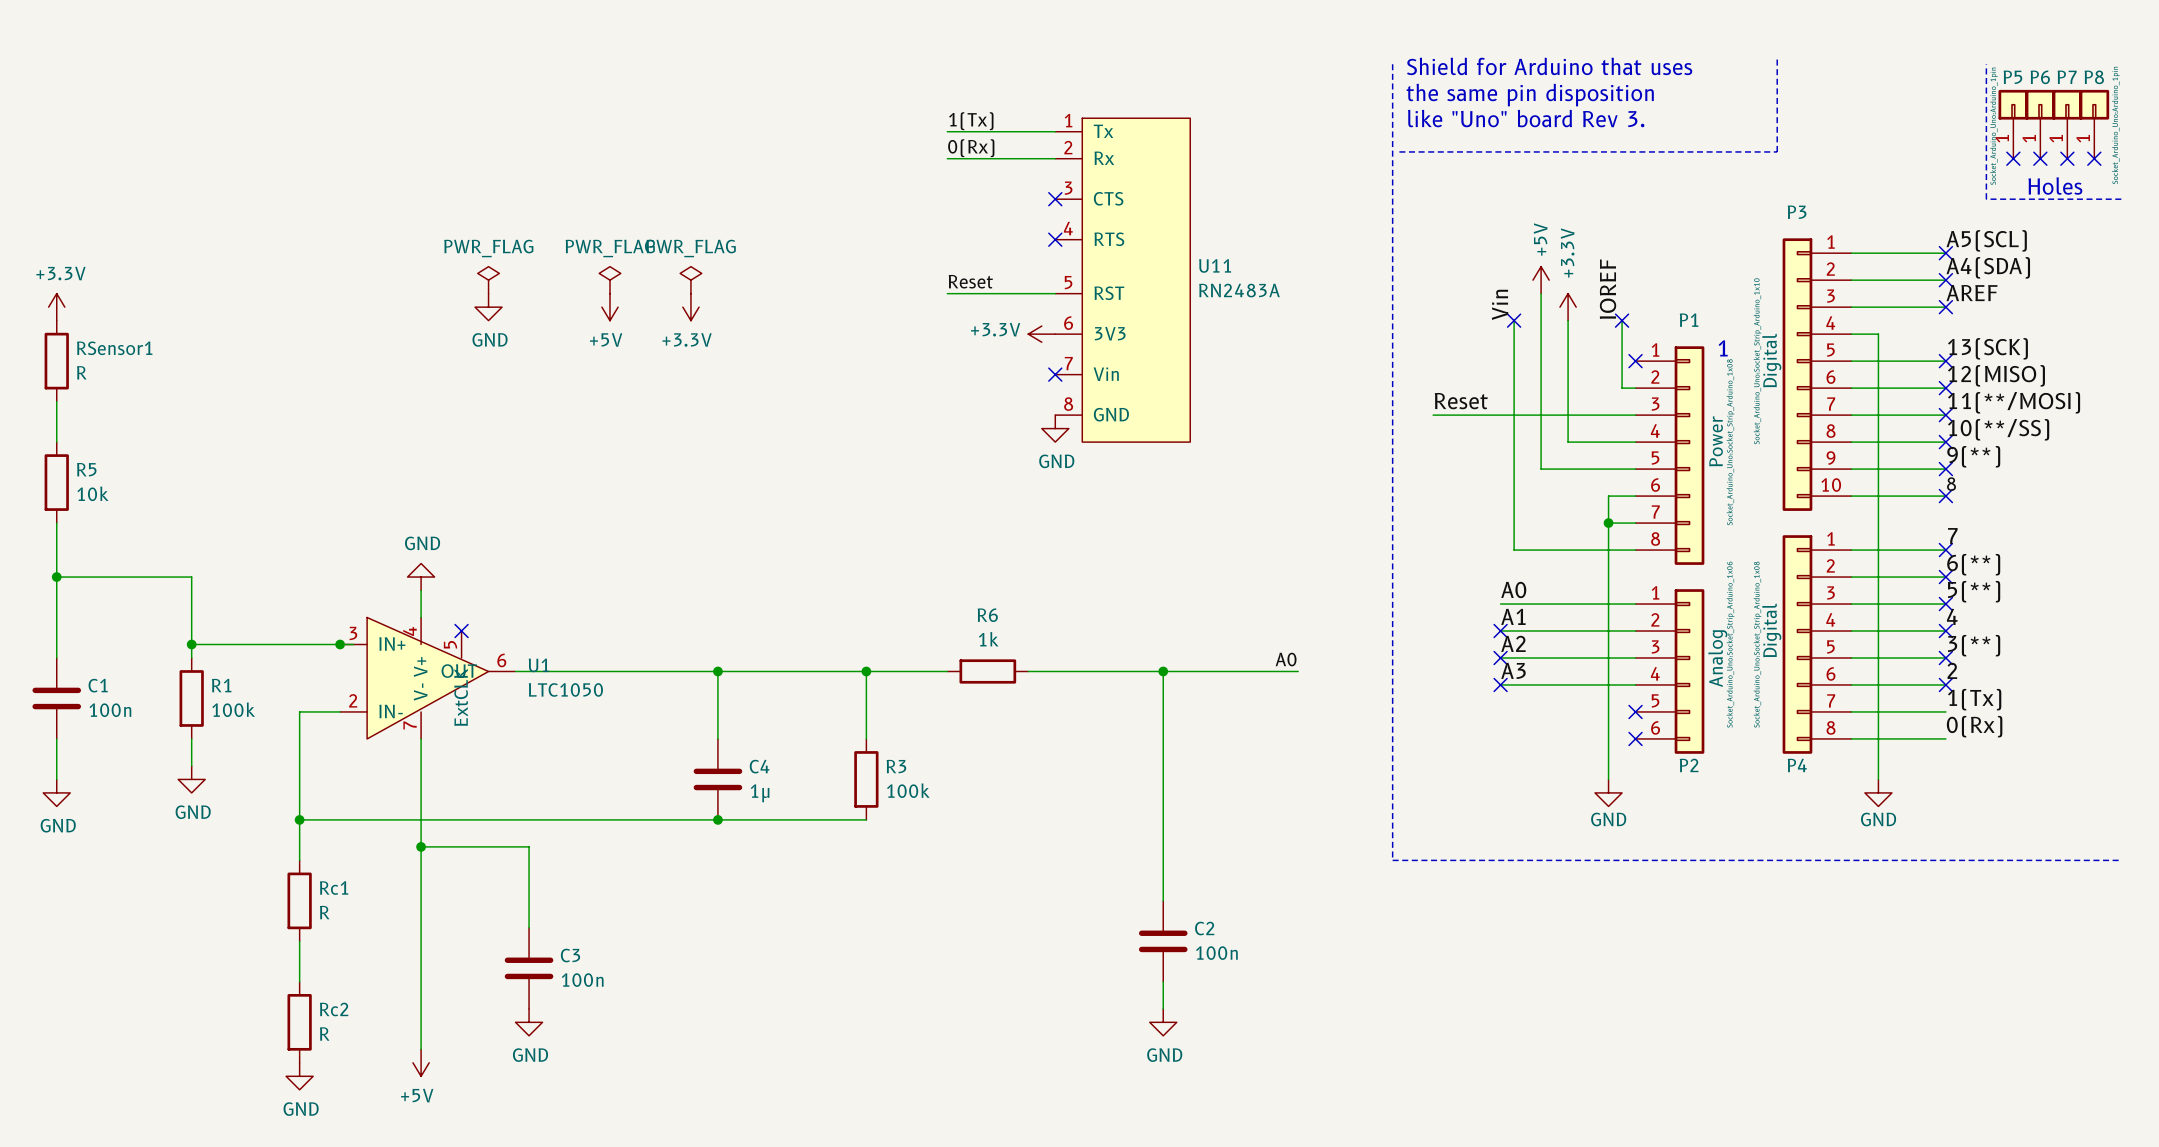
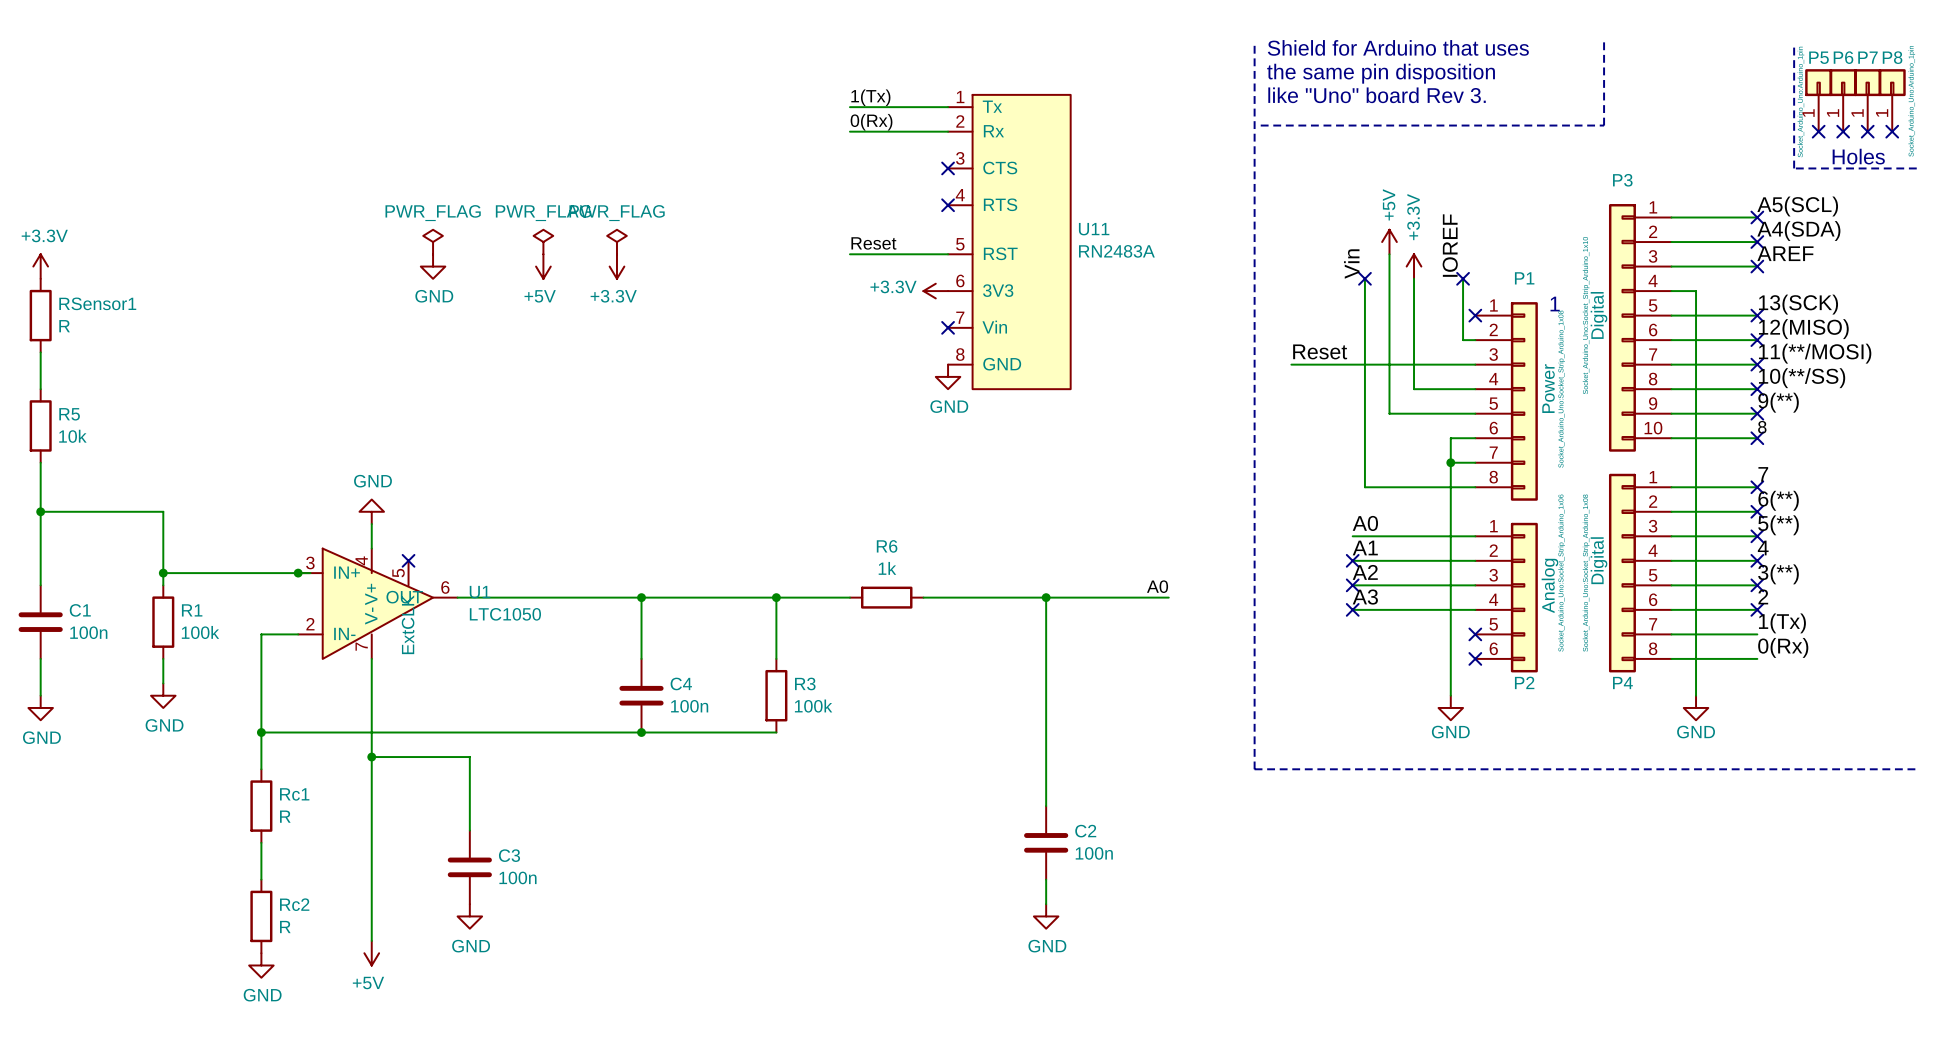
C4 value: 1μ (760, 793) -> 100n (689, 706)

